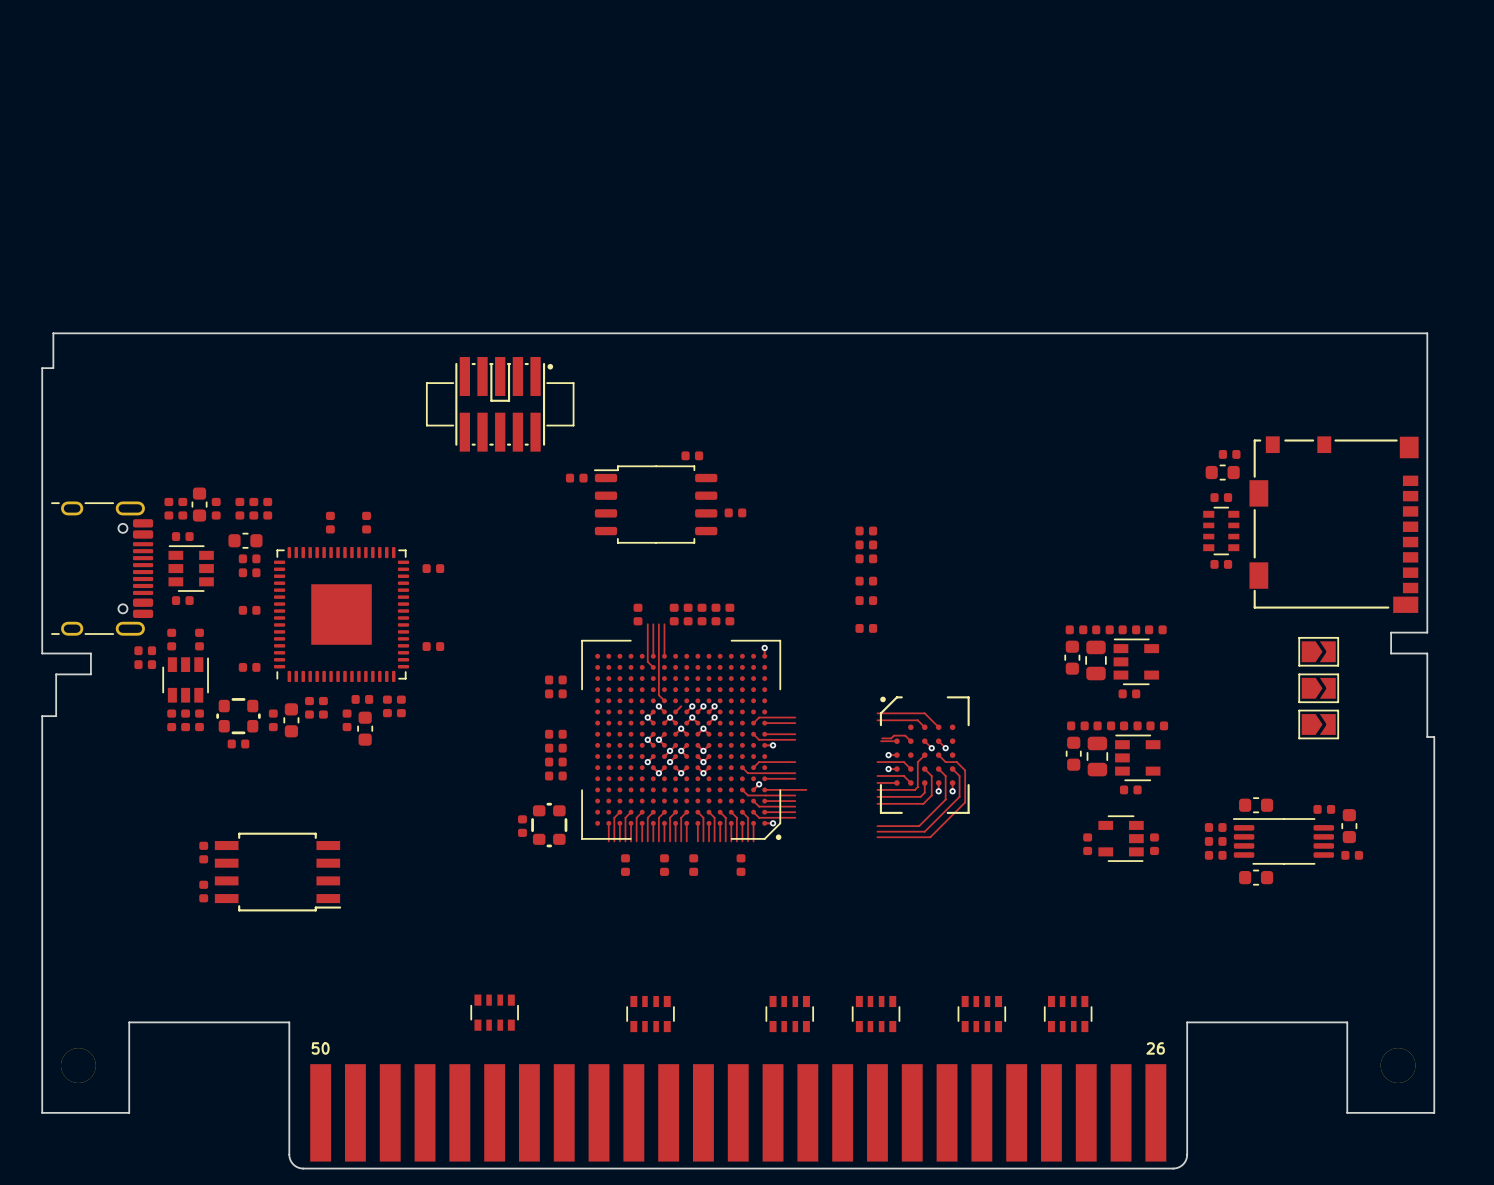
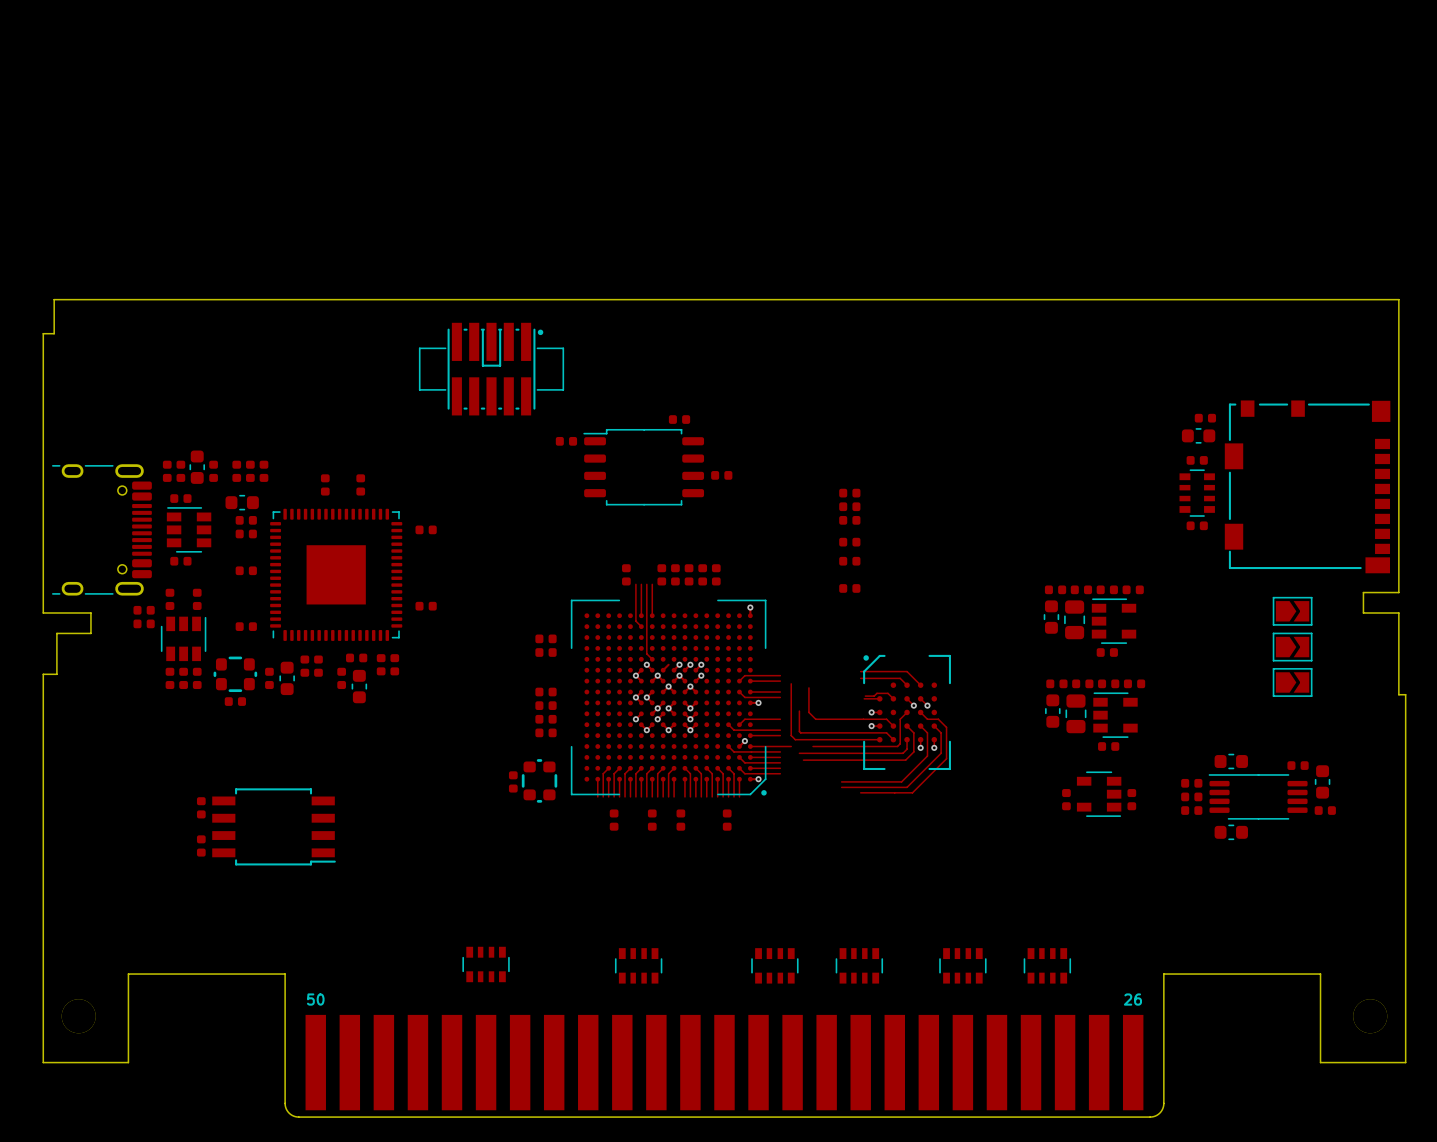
track: none -> (791, 683) (791, 735) (795, 739) (860, 739)
track: none -> (808, 687) (808, 712) (815, 719) (860, 719)
track: none -> (799, 711) (800, 732) (860, 732)
track: none -> (813, 746) (860, 746)
track: none -> (799, 753) (860, 753)
track: none -> (803, 760) (860, 760)
track: none -> (841, 781) (860, 781)
track: none -> (841, 787) (860, 787)

